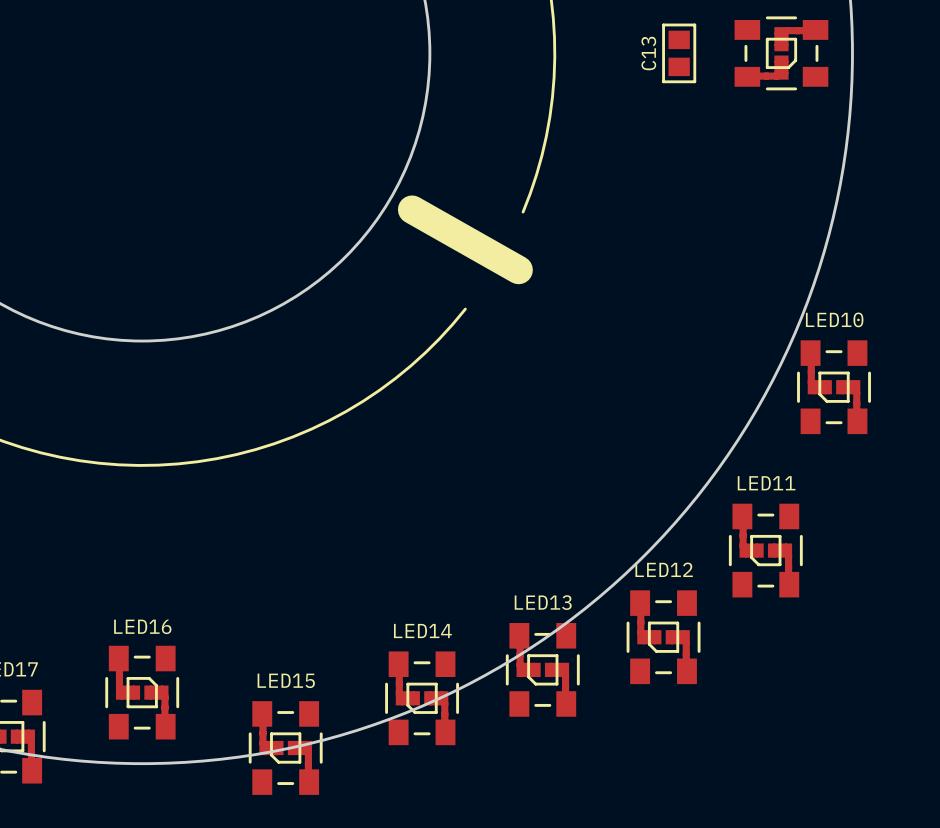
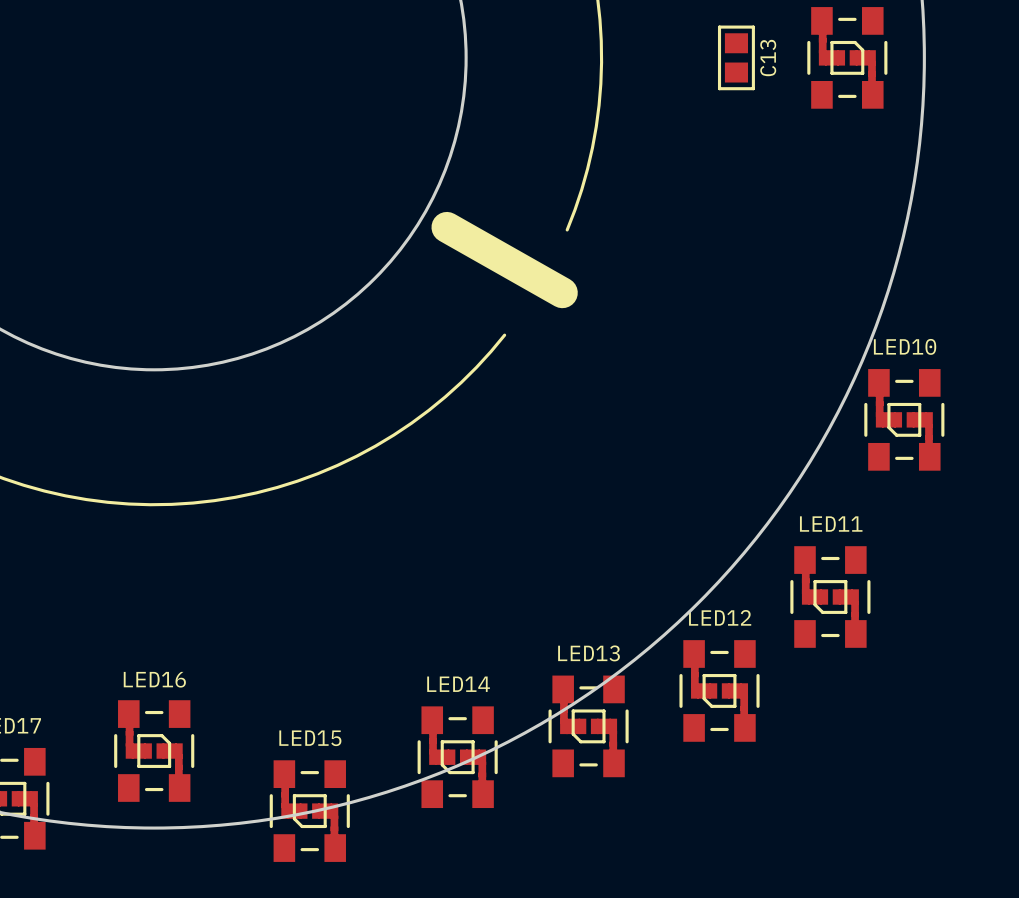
C13 name position: C13 (648, 53) -> C13 (768, 58)
part rotation: 0° (781, 53) -> 90° counterclockwise (847, 57)

